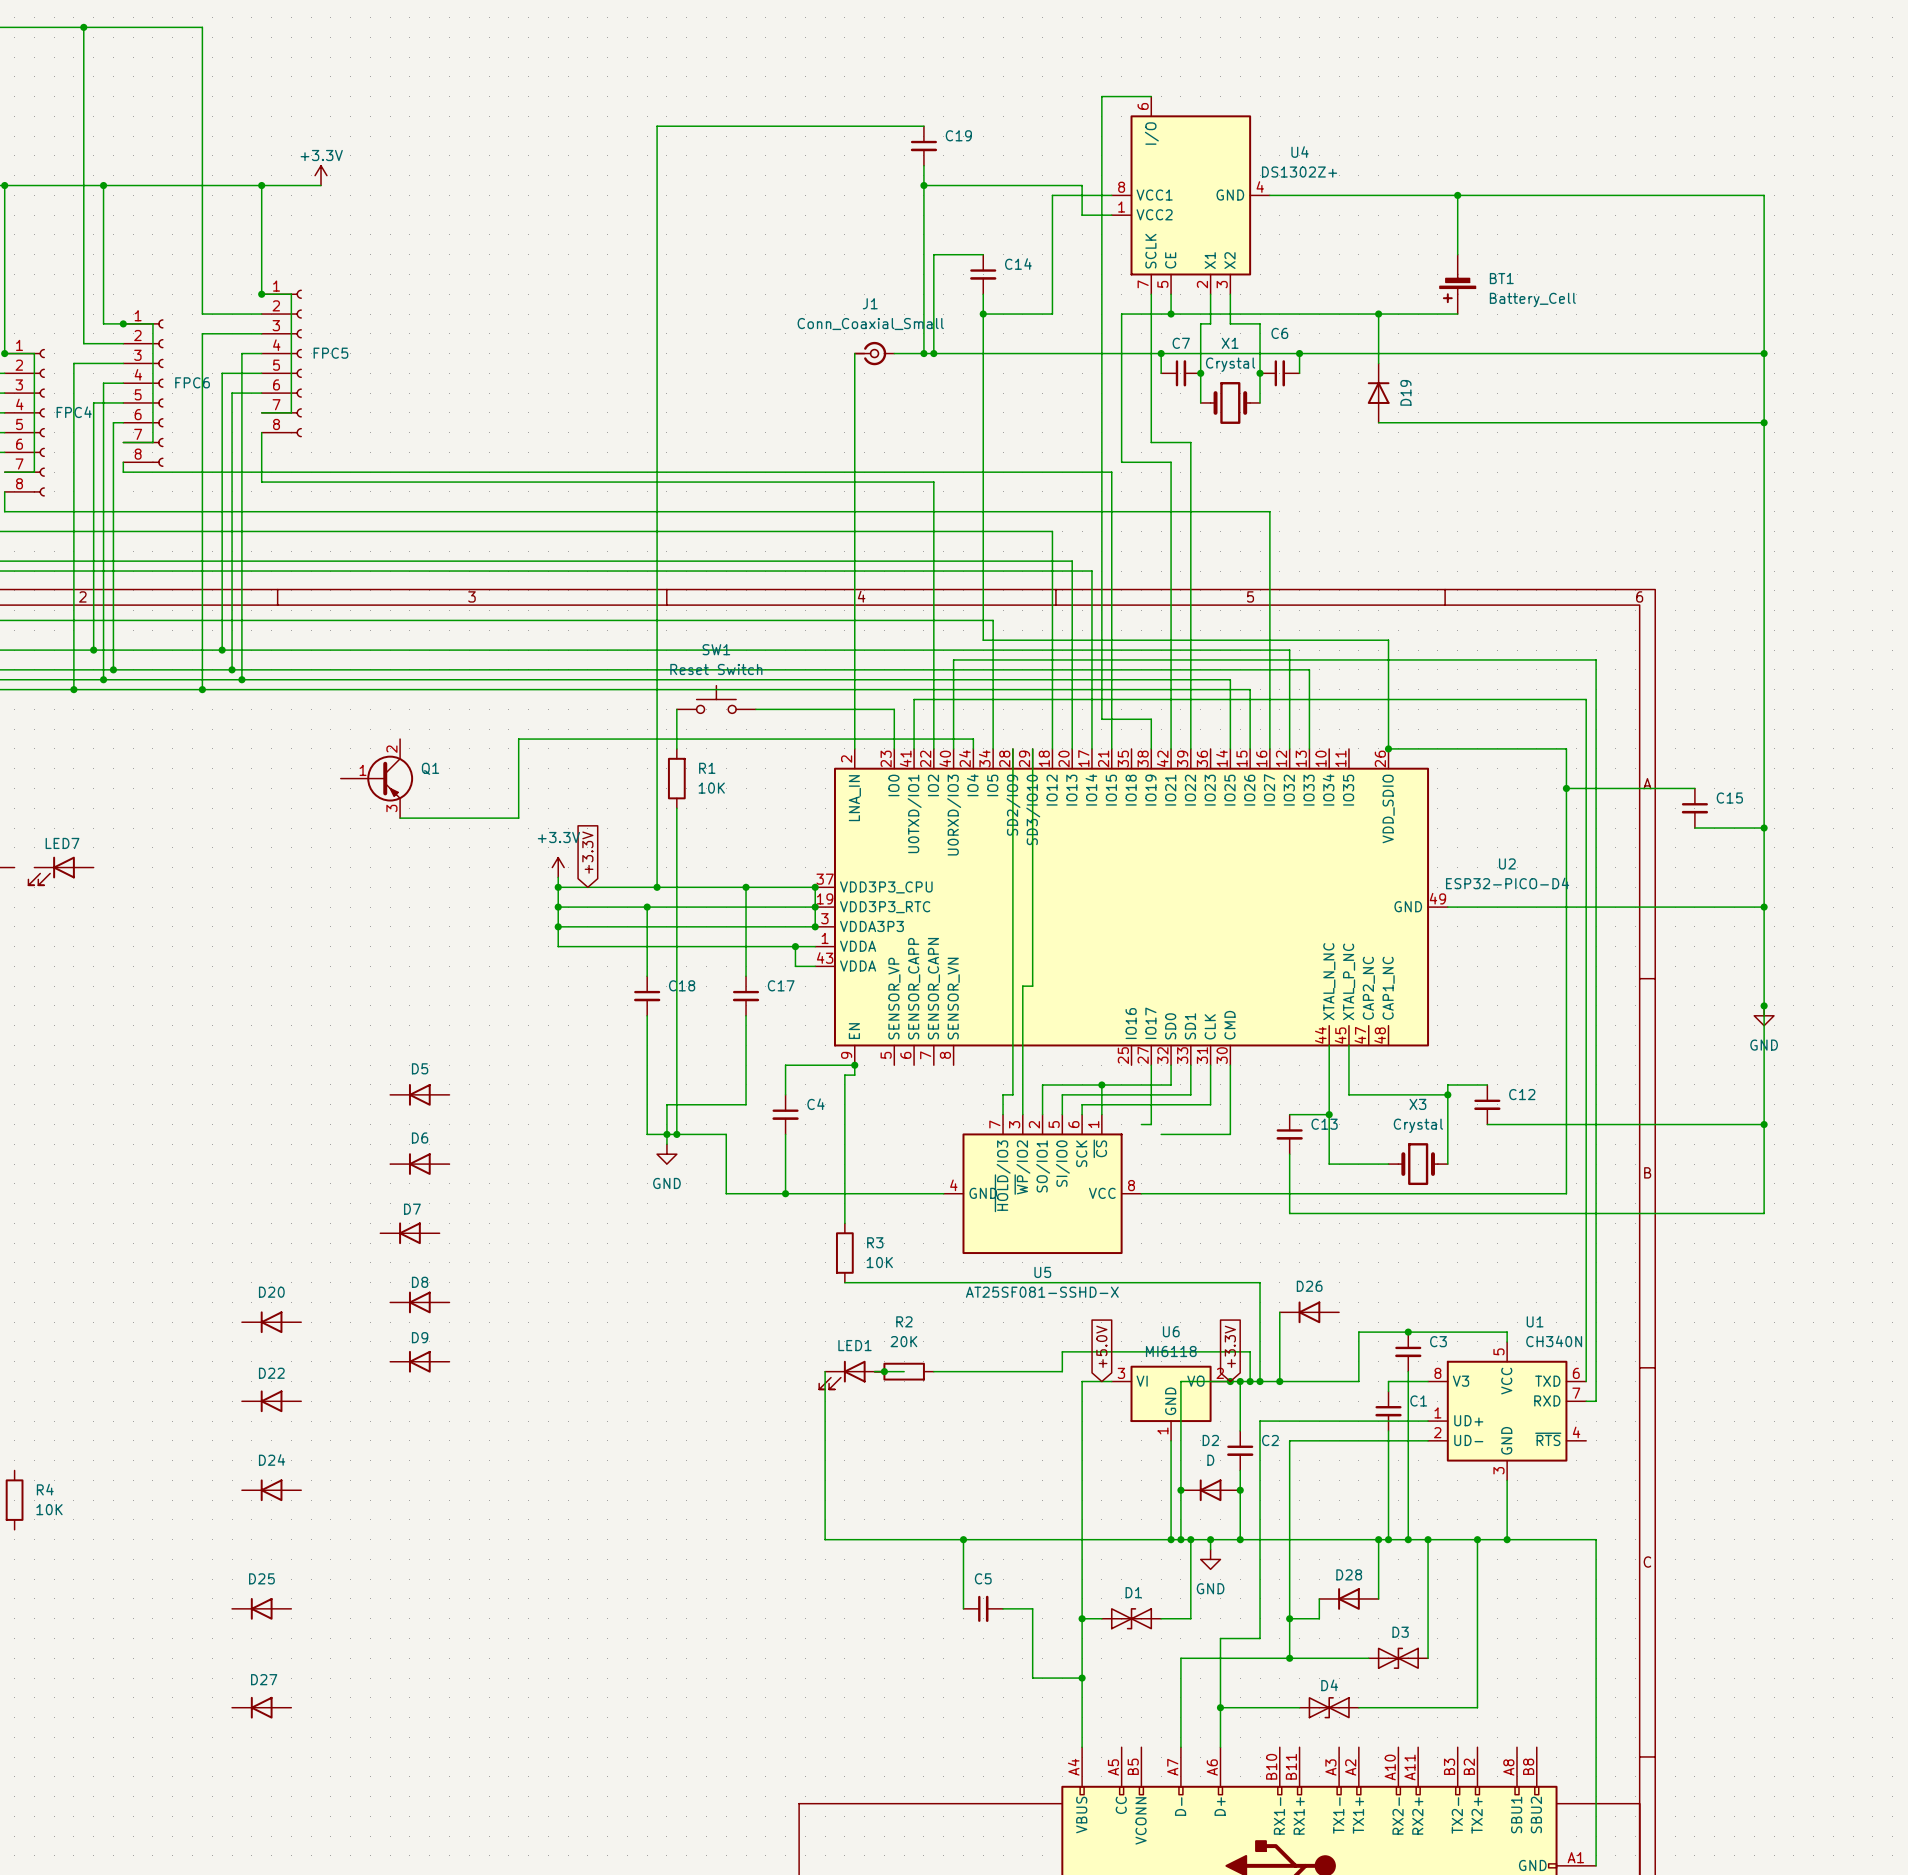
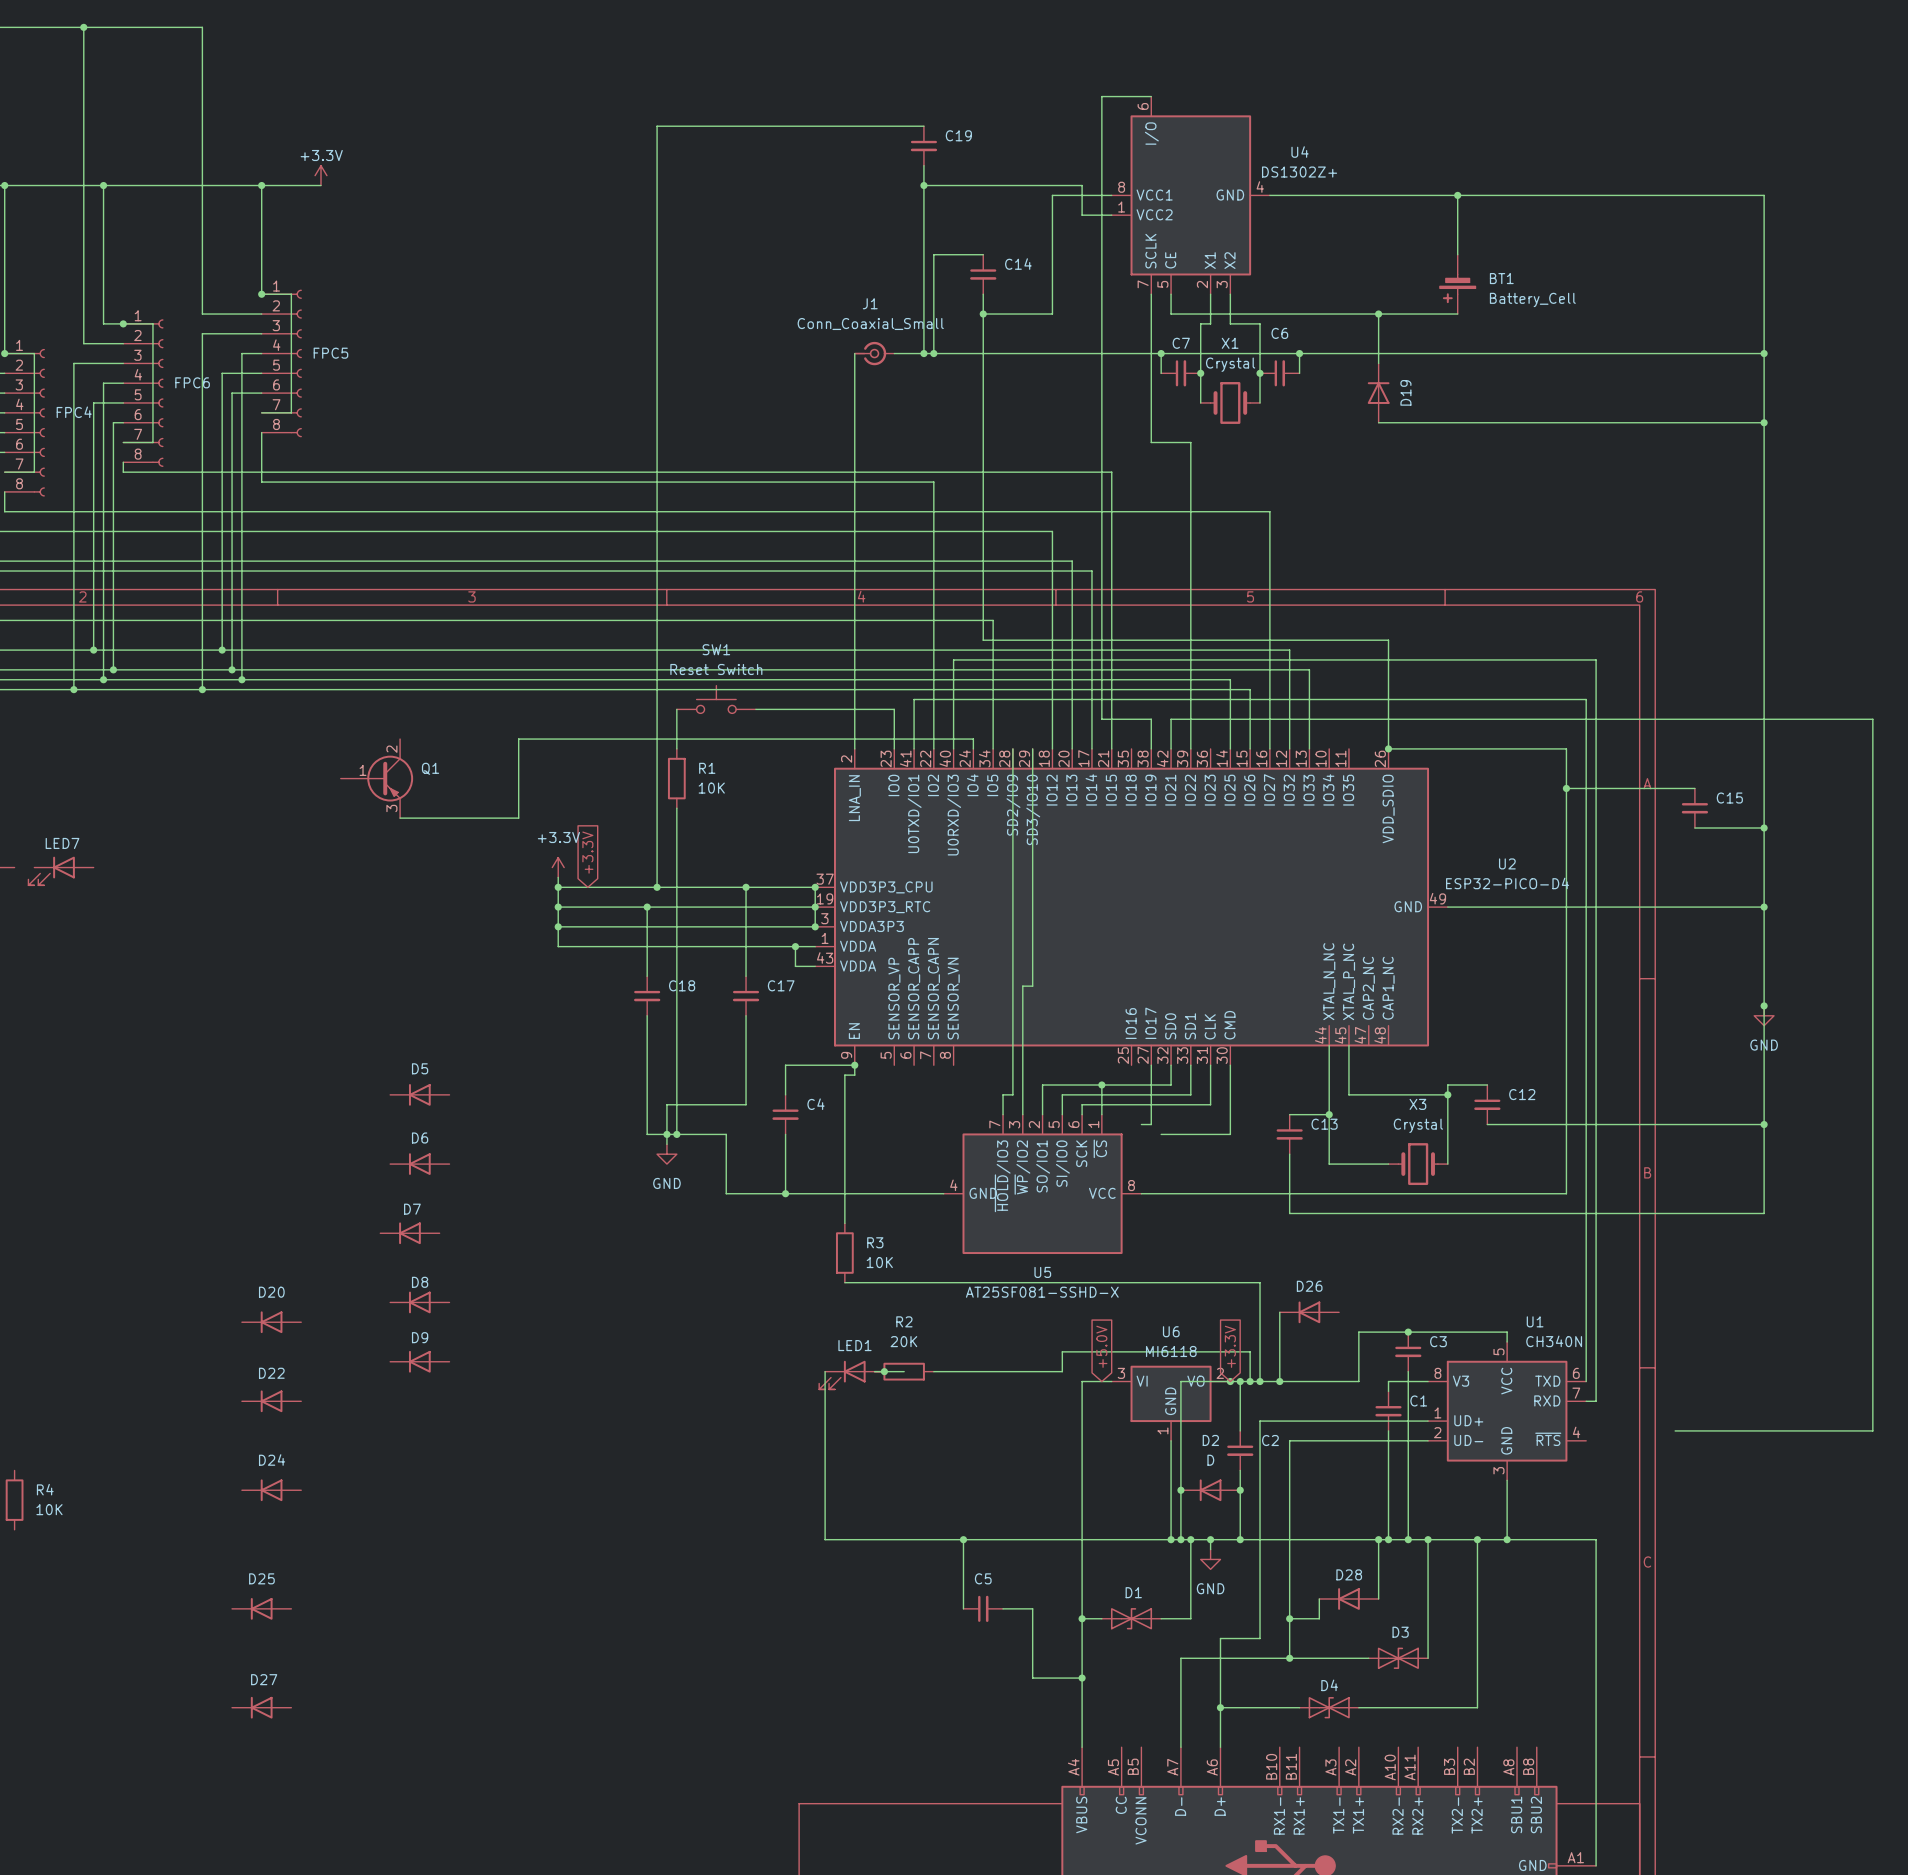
wire: (1171, 314) (1121, 314) (1121, 462) (1171, 462) (1171, 719) -> (1675, 1430) (1872, 1430) (1872, 719) (1171, 719)
junction: (1171, 314) -> none

